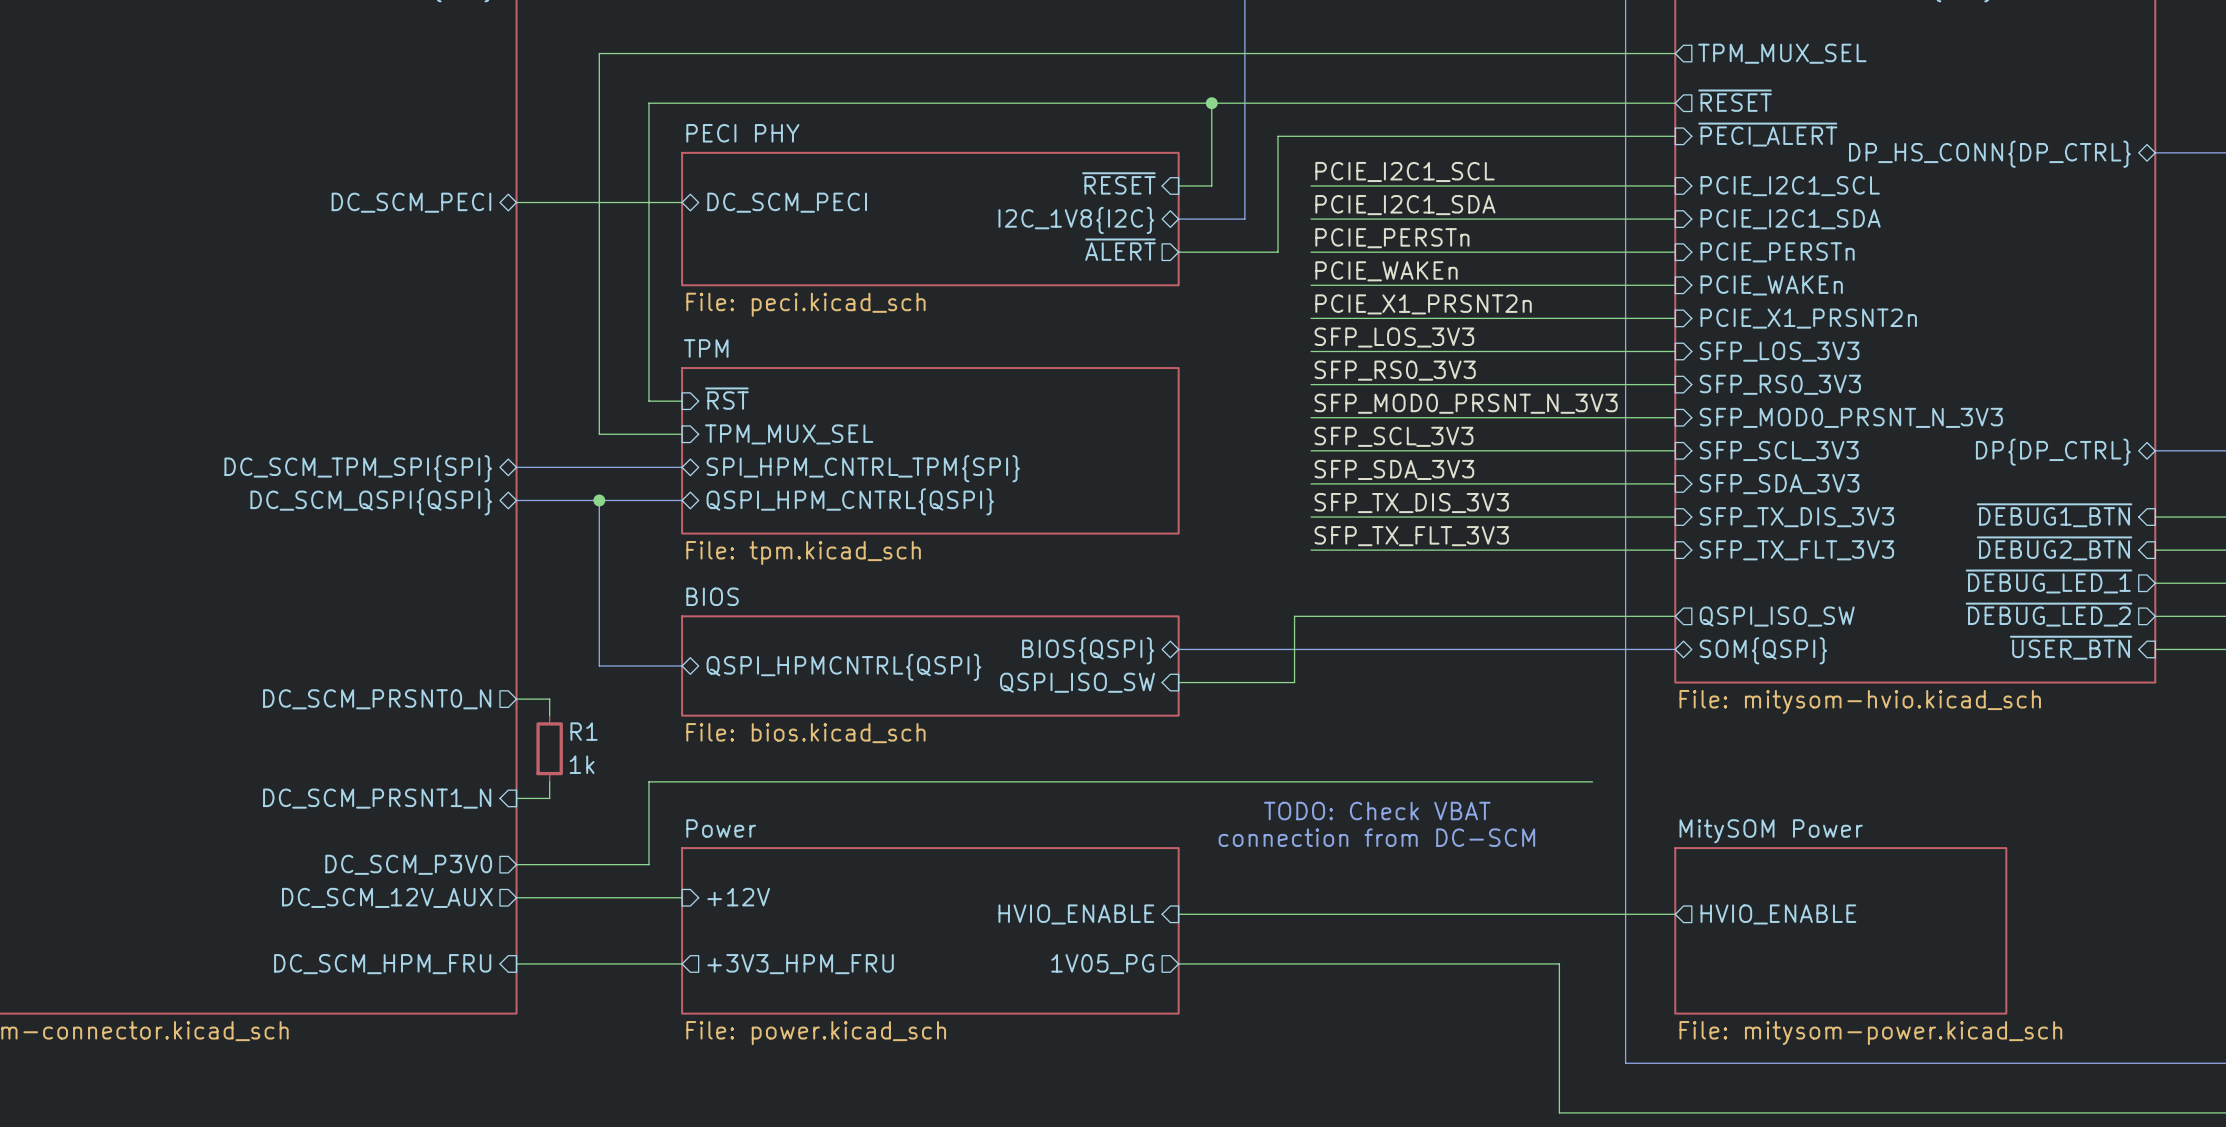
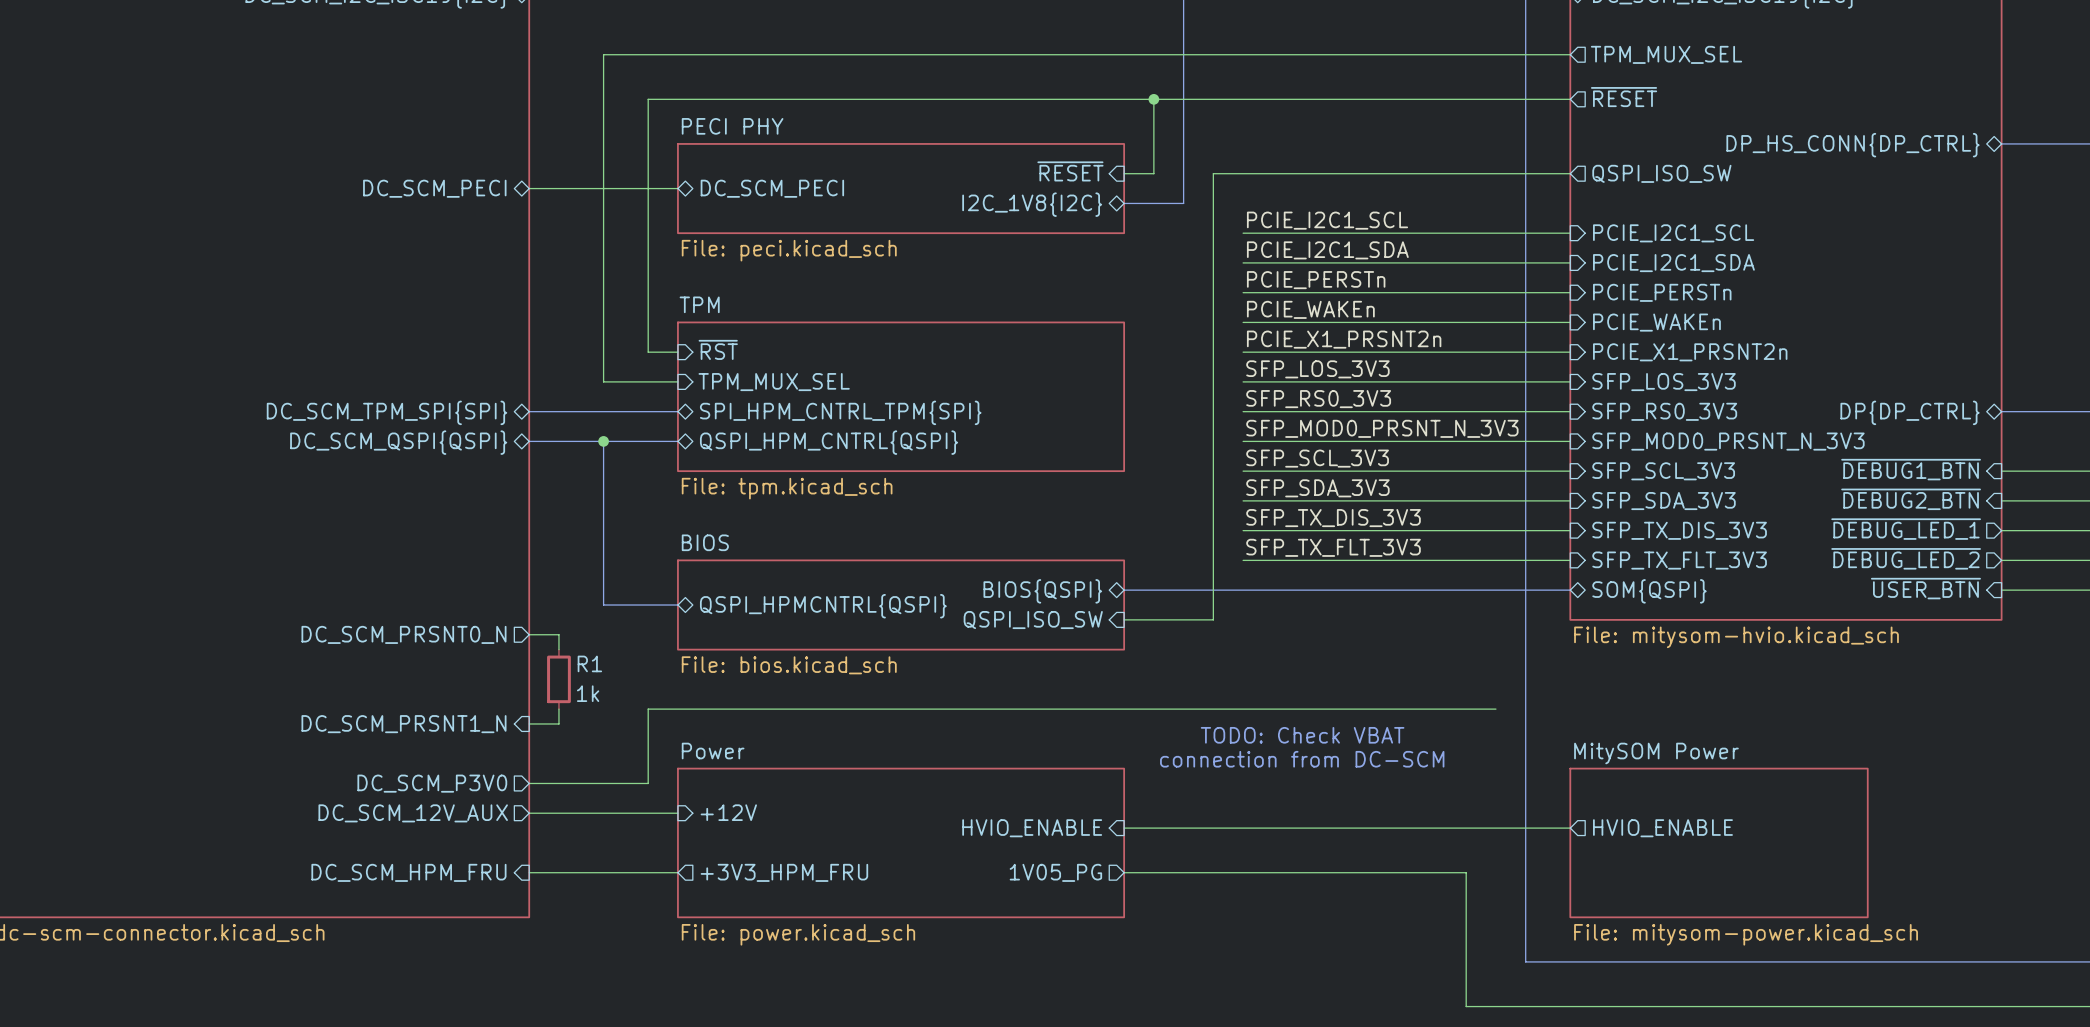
sheet pin: ~{PECI_ALERT} (1767, 134) -> none
wire: (1675, 136) (1277, 136) (1277, 185) -> (1243, 173) (1213, 173)
label: PCIE_I2C1_SCL (1405, 171) -> none
sheet pin shape: input (1790, 186) -> output (1661, 173)
sheet pin: PCIE_I2C1_SCL (1790, 186) -> QSPI_ISO_SW (1661, 173)
sheet PECI PHY: none -> File: peci.kicad_sch (901, 188)
label: PCIE_I2C1_SDA (1405, 205) -> none
sheet PECI PHY: File: peci.kicad_sch (930, 219) -> none
wire: (1311, 219) (1675, 219) -> none
sheet pin: PCIE_I2C1_SDA (1790, 219) -> none
label: PCIE_PERSTn (1392, 238) -> PCIE_I2C1_SCL (1327, 220)
sheet pin: ~{ALERT} (1120, 249) -> none
wire: (1178, 252) (1277, 252) -> none
sheet pin: PCIE_PERSTn (1777, 252) -> PCIE_I2C1_SCL (1673, 233)
label: PCIE_WAKEn (1386, 271) -> PCIE_I2C1_SDA (1327, 250)
sheet pin: PCIE_WAKEn (1771, 285) -> PCIE_I2C1_SDA (1673, 263)
label: PCIE_X1_PRSNT2n (1423, 304) -> PCIE_PERSTn (1316, 280)
sheet pin: PCIE_X1_PRSNT2n (1808, 318) -> PCIE_PERSTn (1662, 292)
label: SFP_LOS_3V3 (1394, 337) -> PCIE_WAKEn (1310, 309)
sheet pin: SFP_LOS_3V3 (1779, 351) -> PCIE_WAKEn (1656, 322)
label: SFP_RS0_3V3 (1395, 370) -> PCIE_X1_PRSNT2n (1344, 339)
wire: (648, 384) (648, 401) (682, 401) -> (648, 352) (677, 352)
sheet pin: SFP_RS0_3V3 (1780, 384) -> PCIE_X1_PRSNT2n (1690, 352)
sheet pin position: ~{RST} (726, 398) -> ~{RST} (718, 349)
label: SFP_MOD0_PRSNT_N_3V3 (1466, 403) -> SFP_LOS_3V3 (1317, 369)
wire: (599, 417) (599, 434) (682, 434) -> (603, 381) (677, 381)
sheet pin: SFP_MOD0_PRSNT_N_3V3 (1851, 417) -> SFP_LOS_3V3 (1664, 382)
sheet pin position: TPM_MUX_SEL (789, 434) -> TPM_MUX_SEL (774, 382)
label: SFP_SCL_3V3 (1393, 436) -> SFP_RS0_3V3 (1318, 399)
sheet TPM position: (930, 450) -> (901, 396)
sheet pin: SFP_SCL_3V3 (1779, 450) -> SFP_RS0_3V3 (1664, 411)
bus: (516, 467) (682, 467) -> (529, 411) (677, 411)
sheet pin position: DC_SCM_TPM_SPI{SPI} (358, 468) -> DC_SCM_TPM_SPI{SPI} (386, 412)
sheet pin position: SPI_HPM_CNTRL_TPM{SPI} (863, 468) -> SPI_HPM_CNTRL_TPM{SPI} (840, 412)
label: SFP_SDA_3V3 (1394, 469) -> SFP_MOD0_PRSNT_N_3V3 (1382, 428)
bus: none -> (603, 441) (603, 456)
sheet pin: SFP_SDA_3V3 (1779, 484) -> SFP_MOD0_PRSNT_N_3V3 (1728, 441)
bus: (516, 500) (682, 500) -> (529, 441) (677, 441)
junction position: (599, 500) -> (603, 441)
sheet pin position: DC_SCM_QSPI{QSPI} (371, 501) -> DC_SCM_QSPI{QSPI} (398, 442)
sheet pin position: QSPI_HPM_CNTRL{QSPI} (850, 501) -> QSPI_HPM_CNTRL{QSPI} (829, 442)
label: SFP_TX_DIS_3V3 (1411, 503) -> SFP_SCL_3V3 (1317, 458)
sheet pin: SFP_TX_DIS_3V3 (1796, 517) -> SFP_SCL_3V3 (1663, 471)
label: SFP_TX_FLT_3V3 (1411, 536) -> SFP_SDA_3V3 (1317, 488)
sheet pin: SFP_TX_FLT_3V3 (1796, 550) -> SFP_SDA_3V3 (1664, 501)
label: none -> SFP_TX_DIS_3V3 (1333, 518)
wire: none -> (1243, 530) (1570, 530)
sheet pin: none -> SFP_TX_DIS_3V3 (1679, 530)
label: none -> SFP_TX_FLT_3V3 (1333, 547)
wire: (1311, 616) (1294, 616) (1294, 682) (1277, 682) -> (1213, 233) (1213, 619)
sheet pin shape: output (1777, 616) -> input (1679, 560)
sheet pin: QSPI_ISO_SW (1777, 616) -> SFP_TX_FLT_3V3 (1679, 560)

